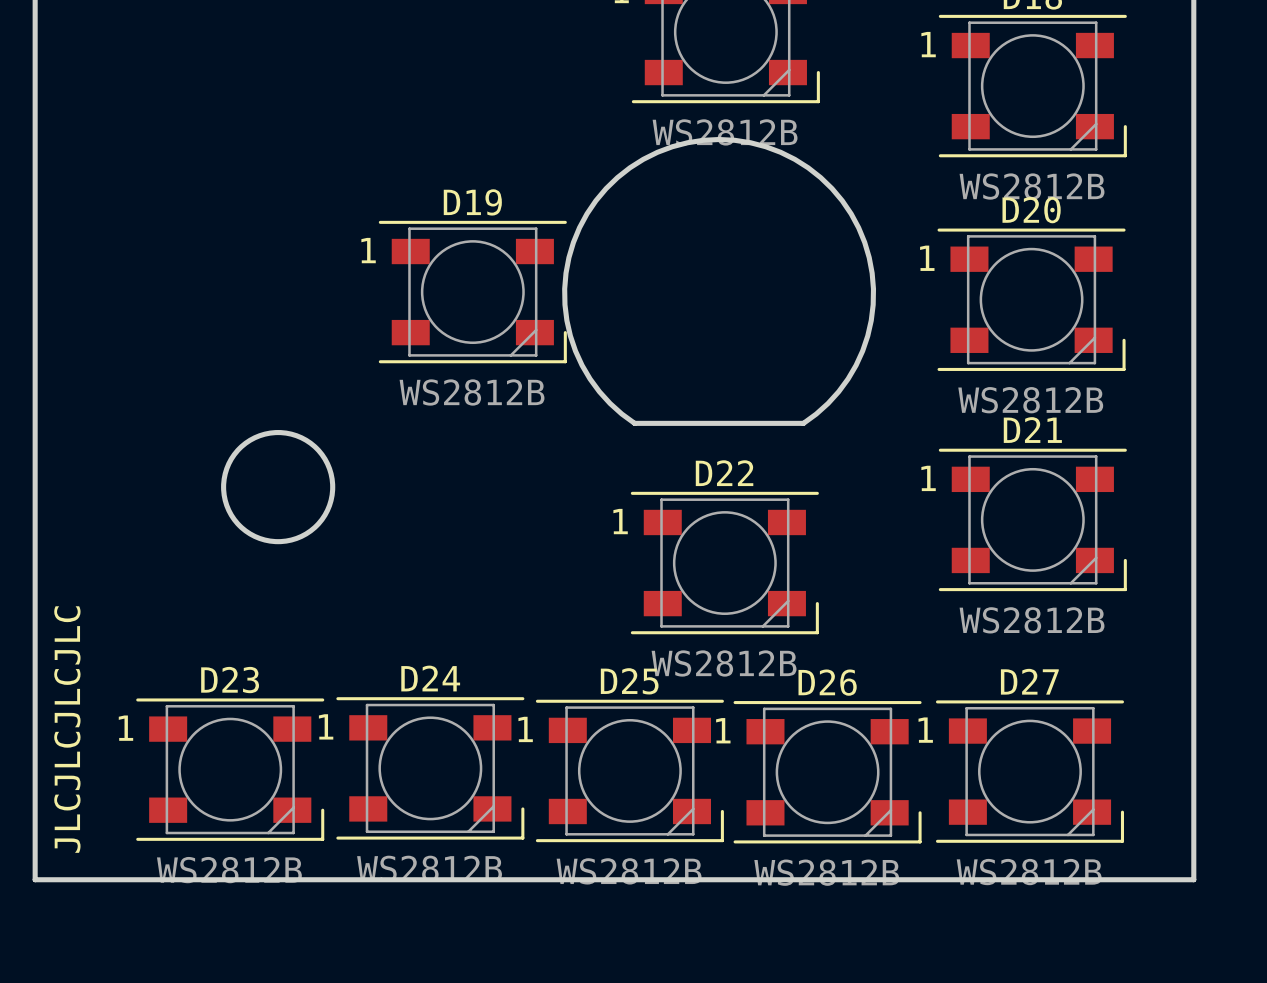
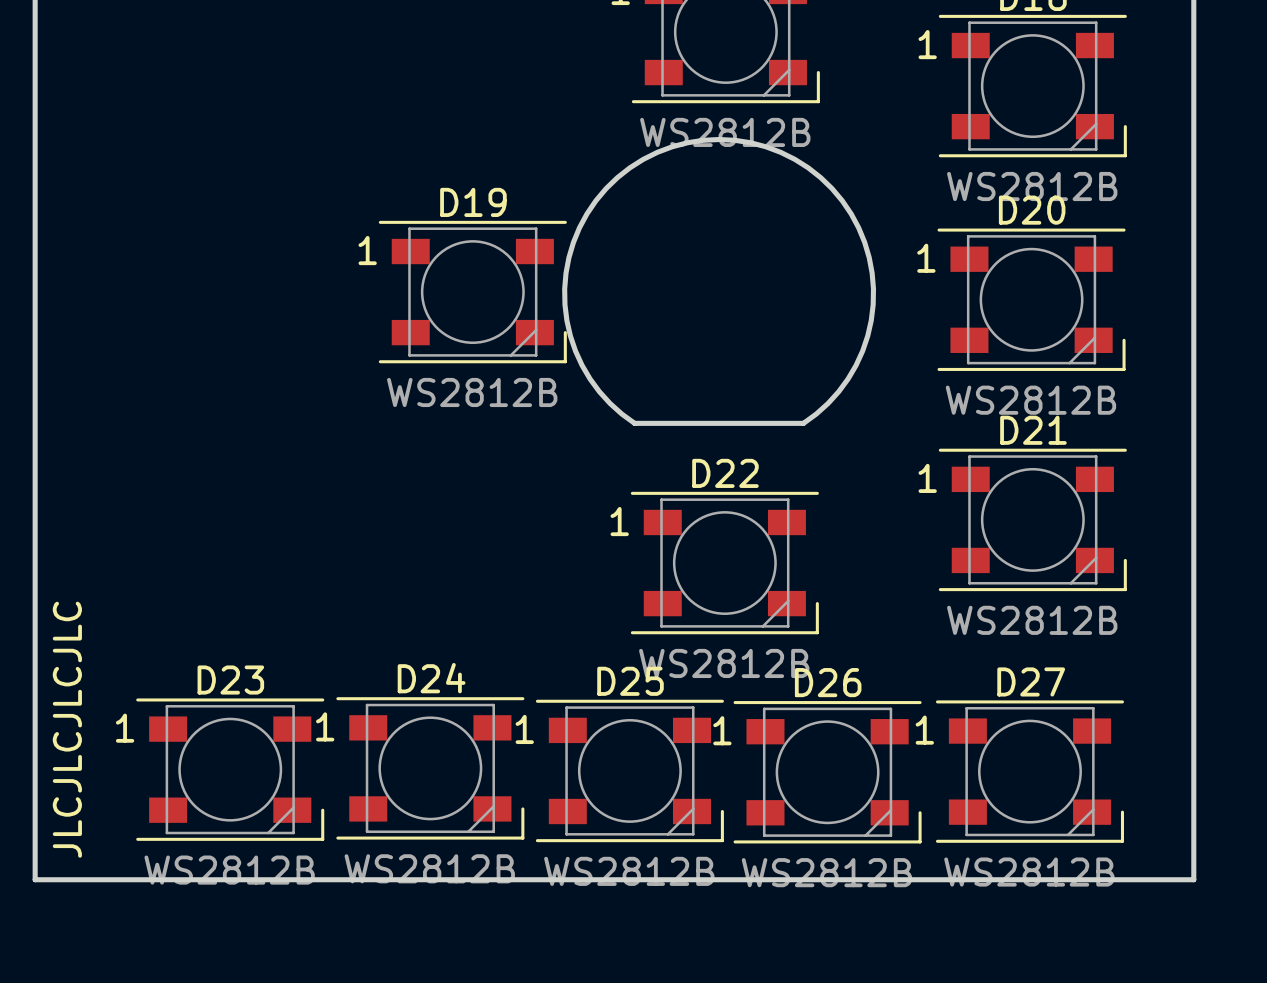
round board edge: [221, 430, 336, 545] -> none

